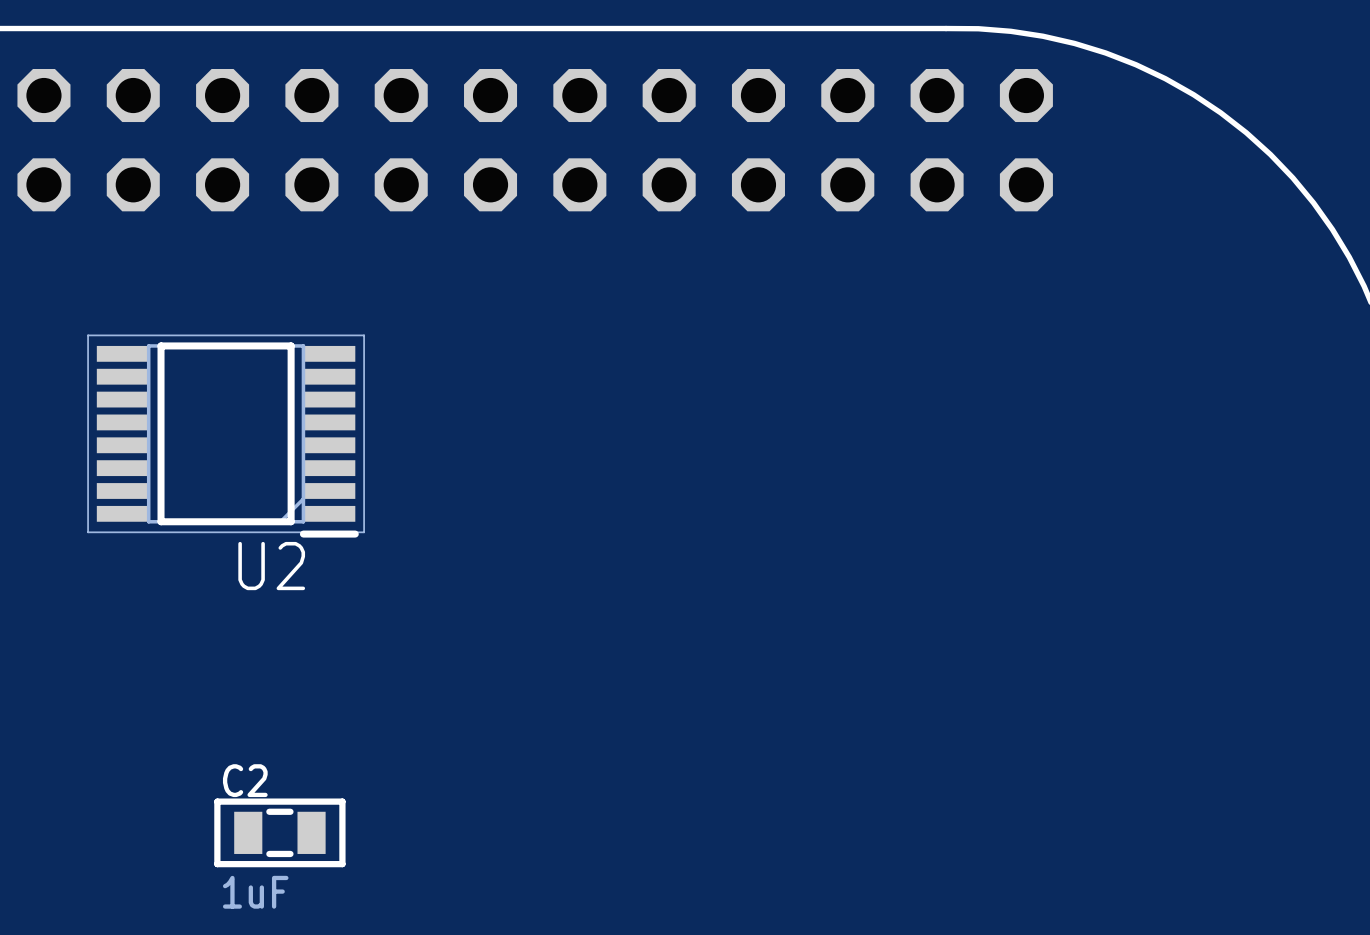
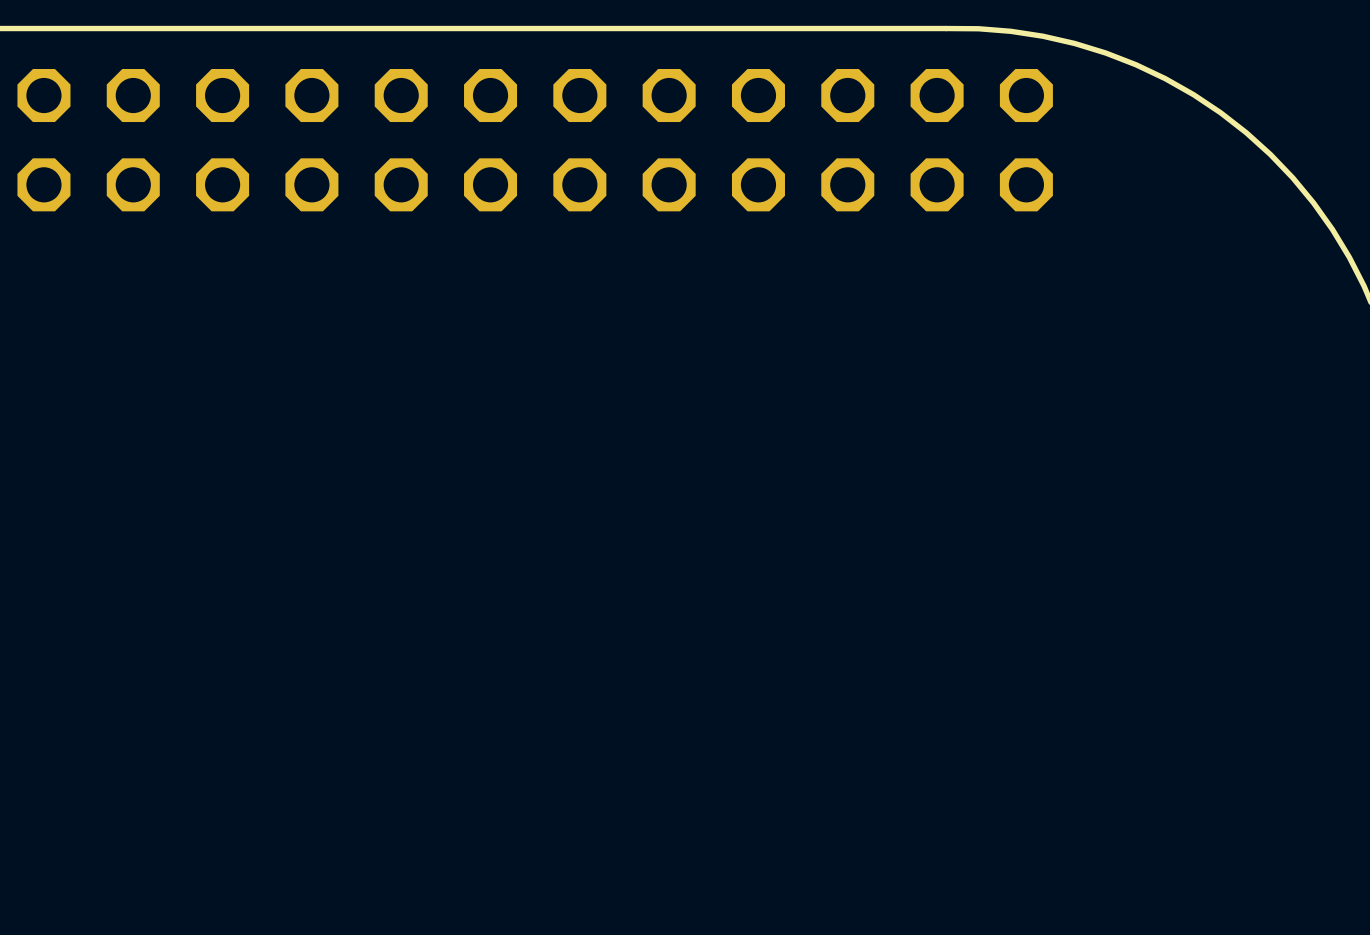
U2: (226, 436) -> none
C2: 1uF (279, 832) -> none

